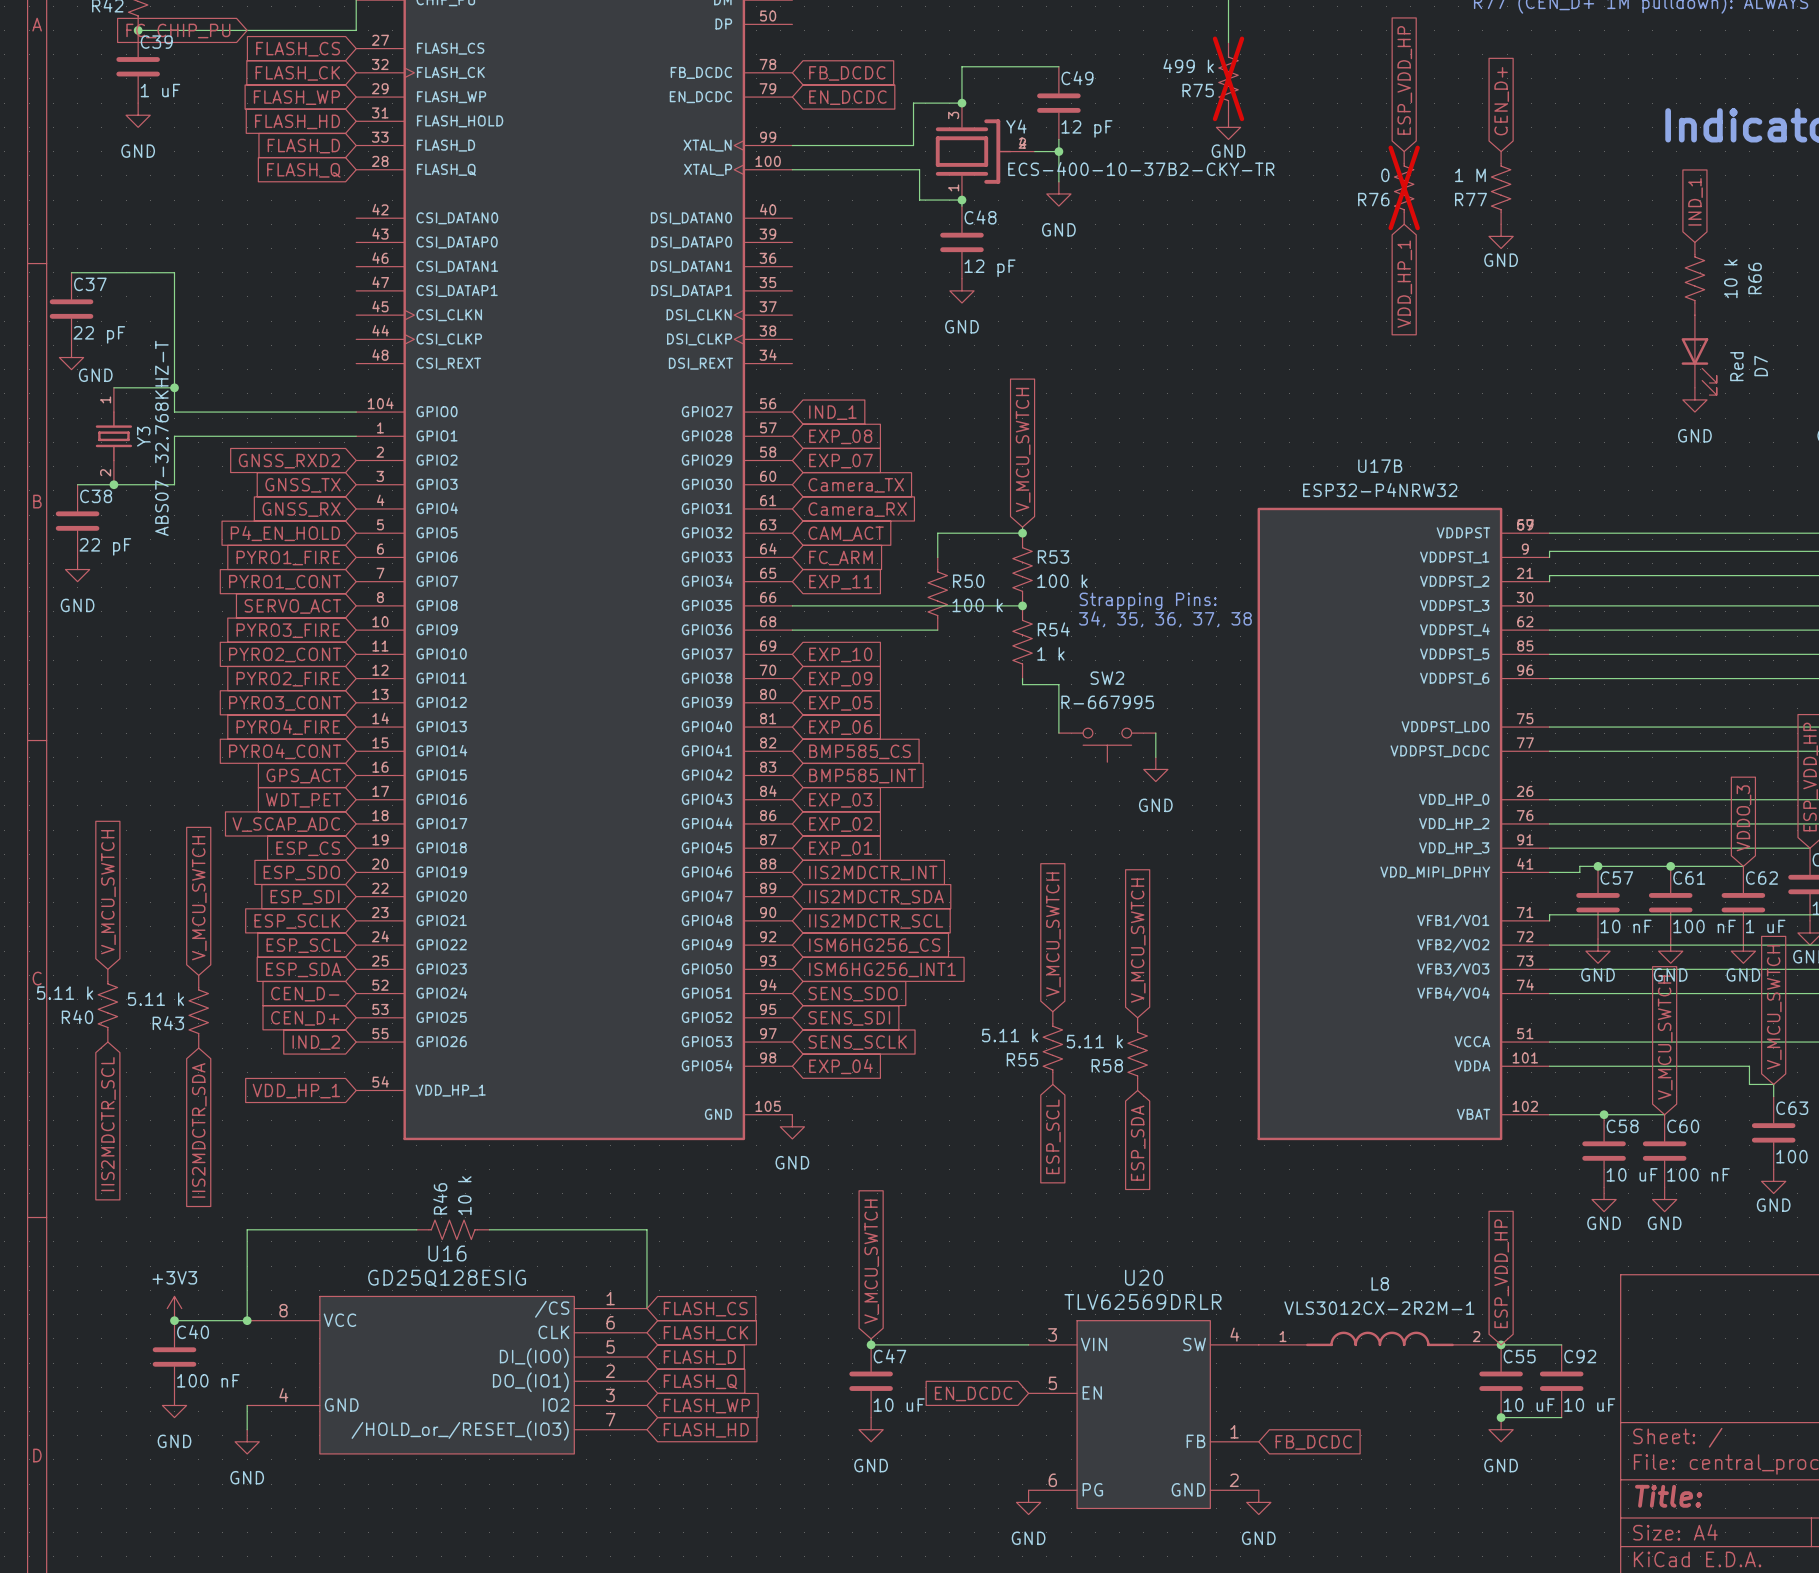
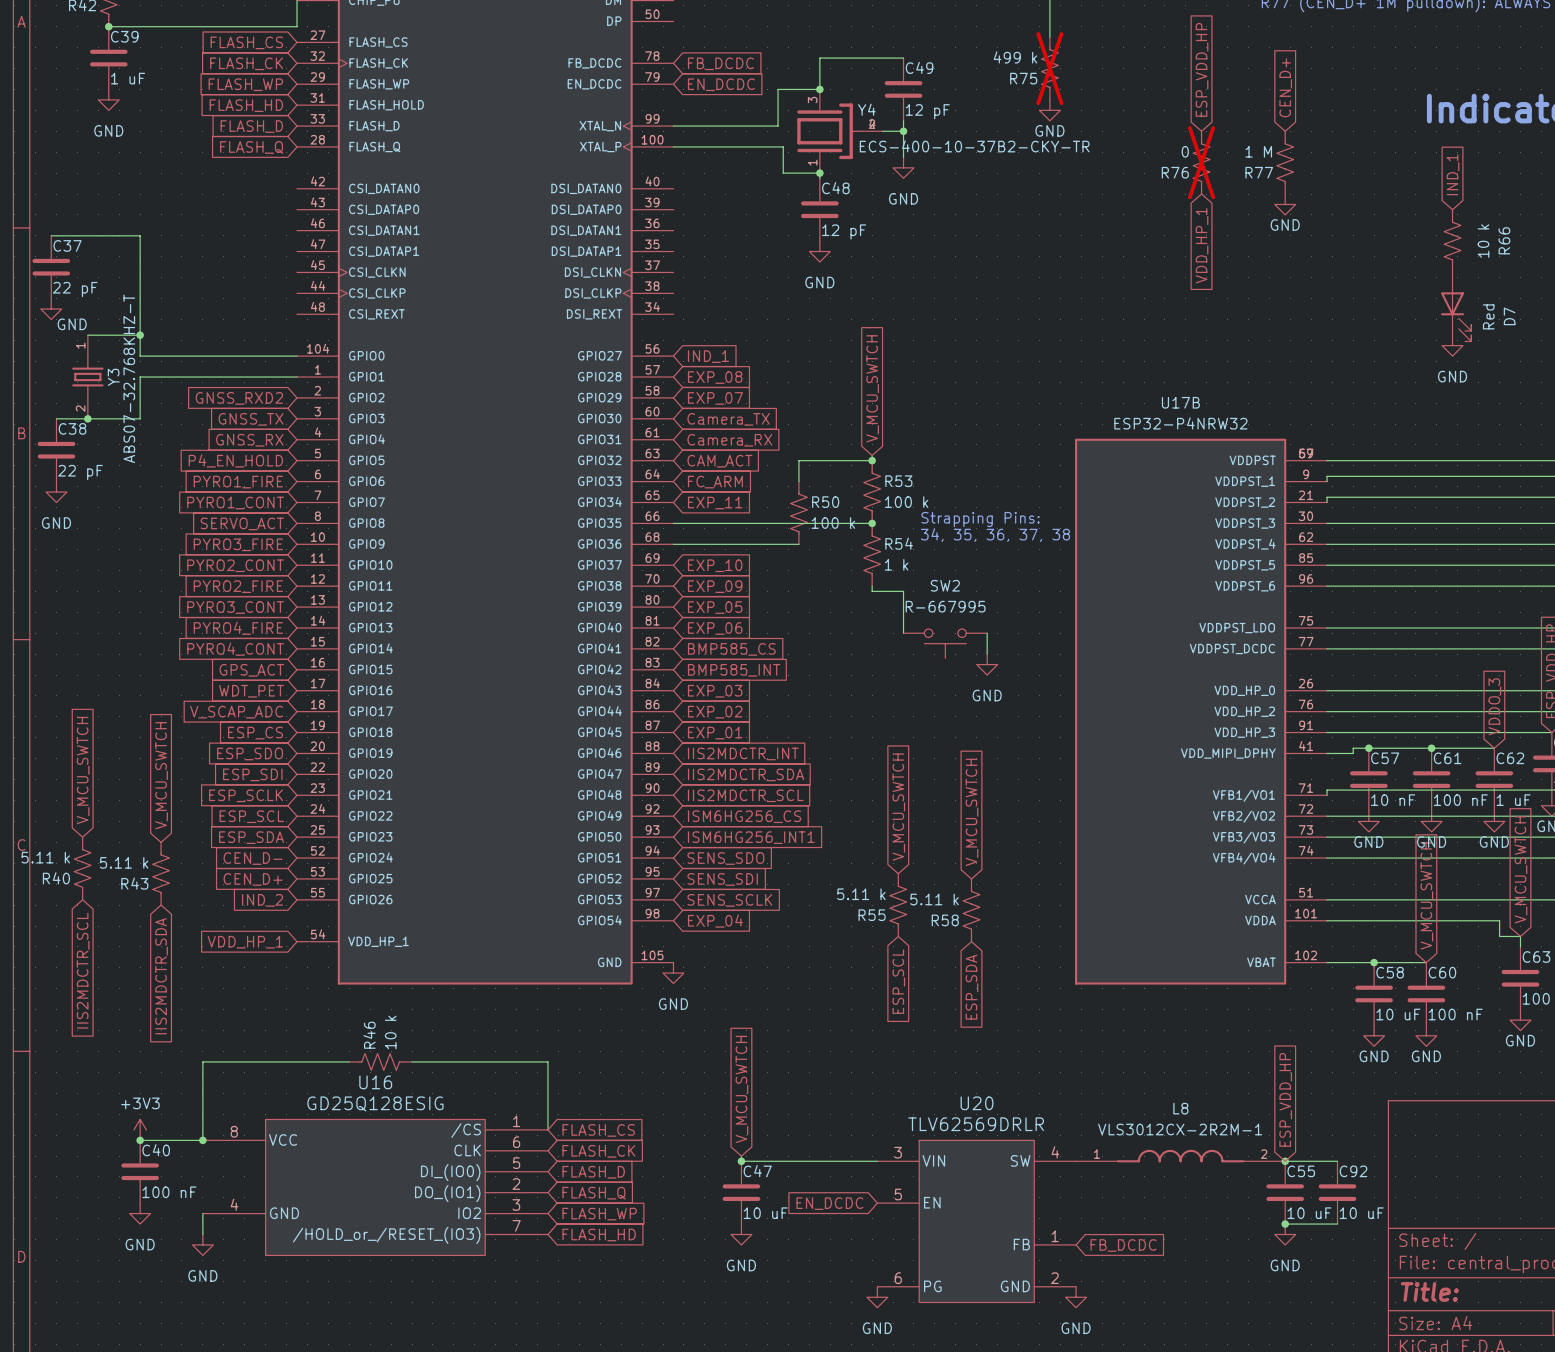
global label: FC_CHIP_PU (178, 31) -> none

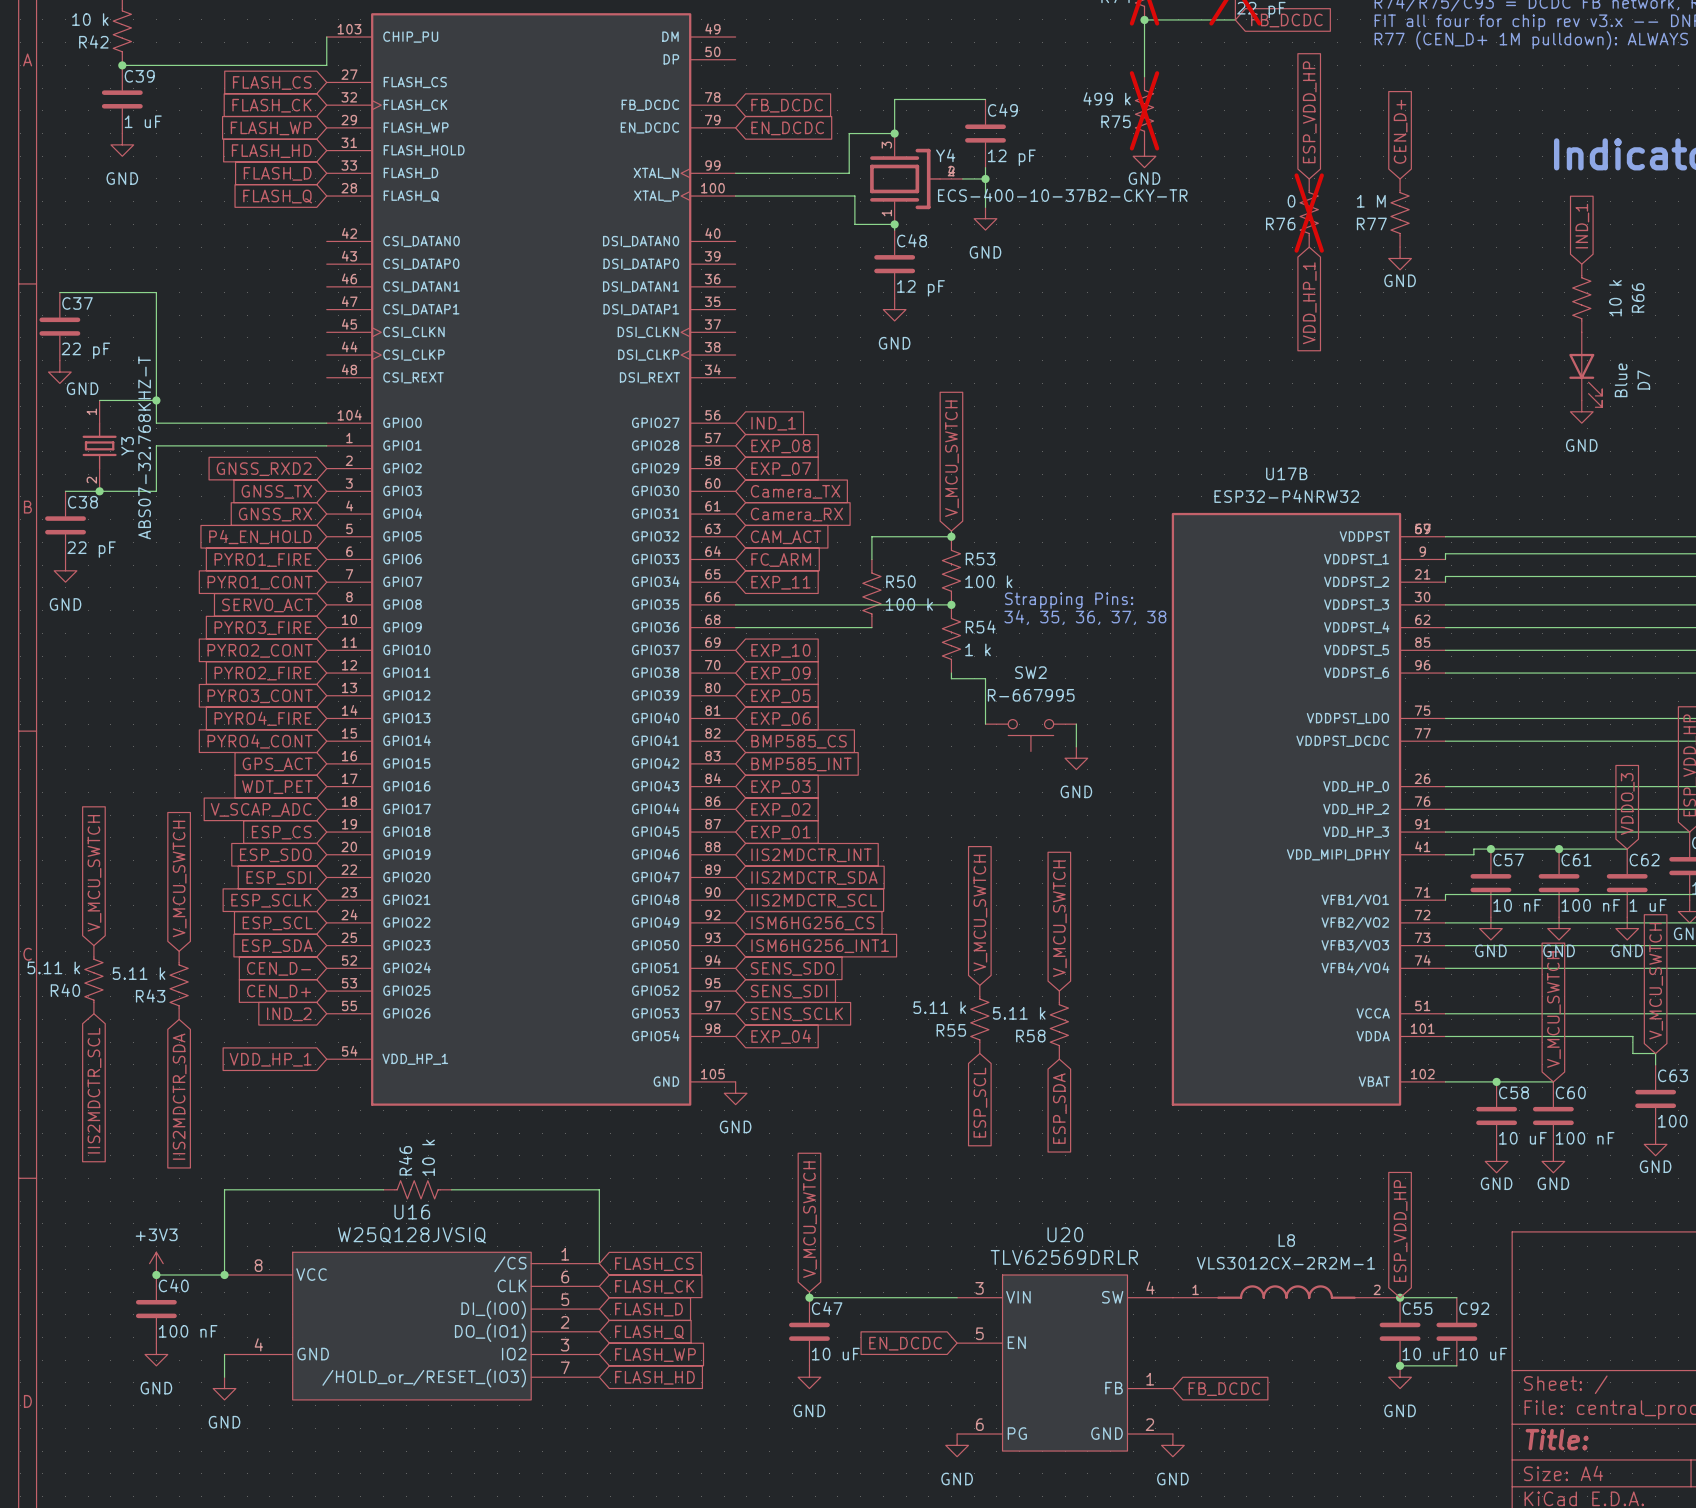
D7 value: Red (1488, 316) -> Blue (1621, 380)
U16 value: GD25Q128ESIG (375, 1103) -> W25Q128JVSIQ (411, 1235)

